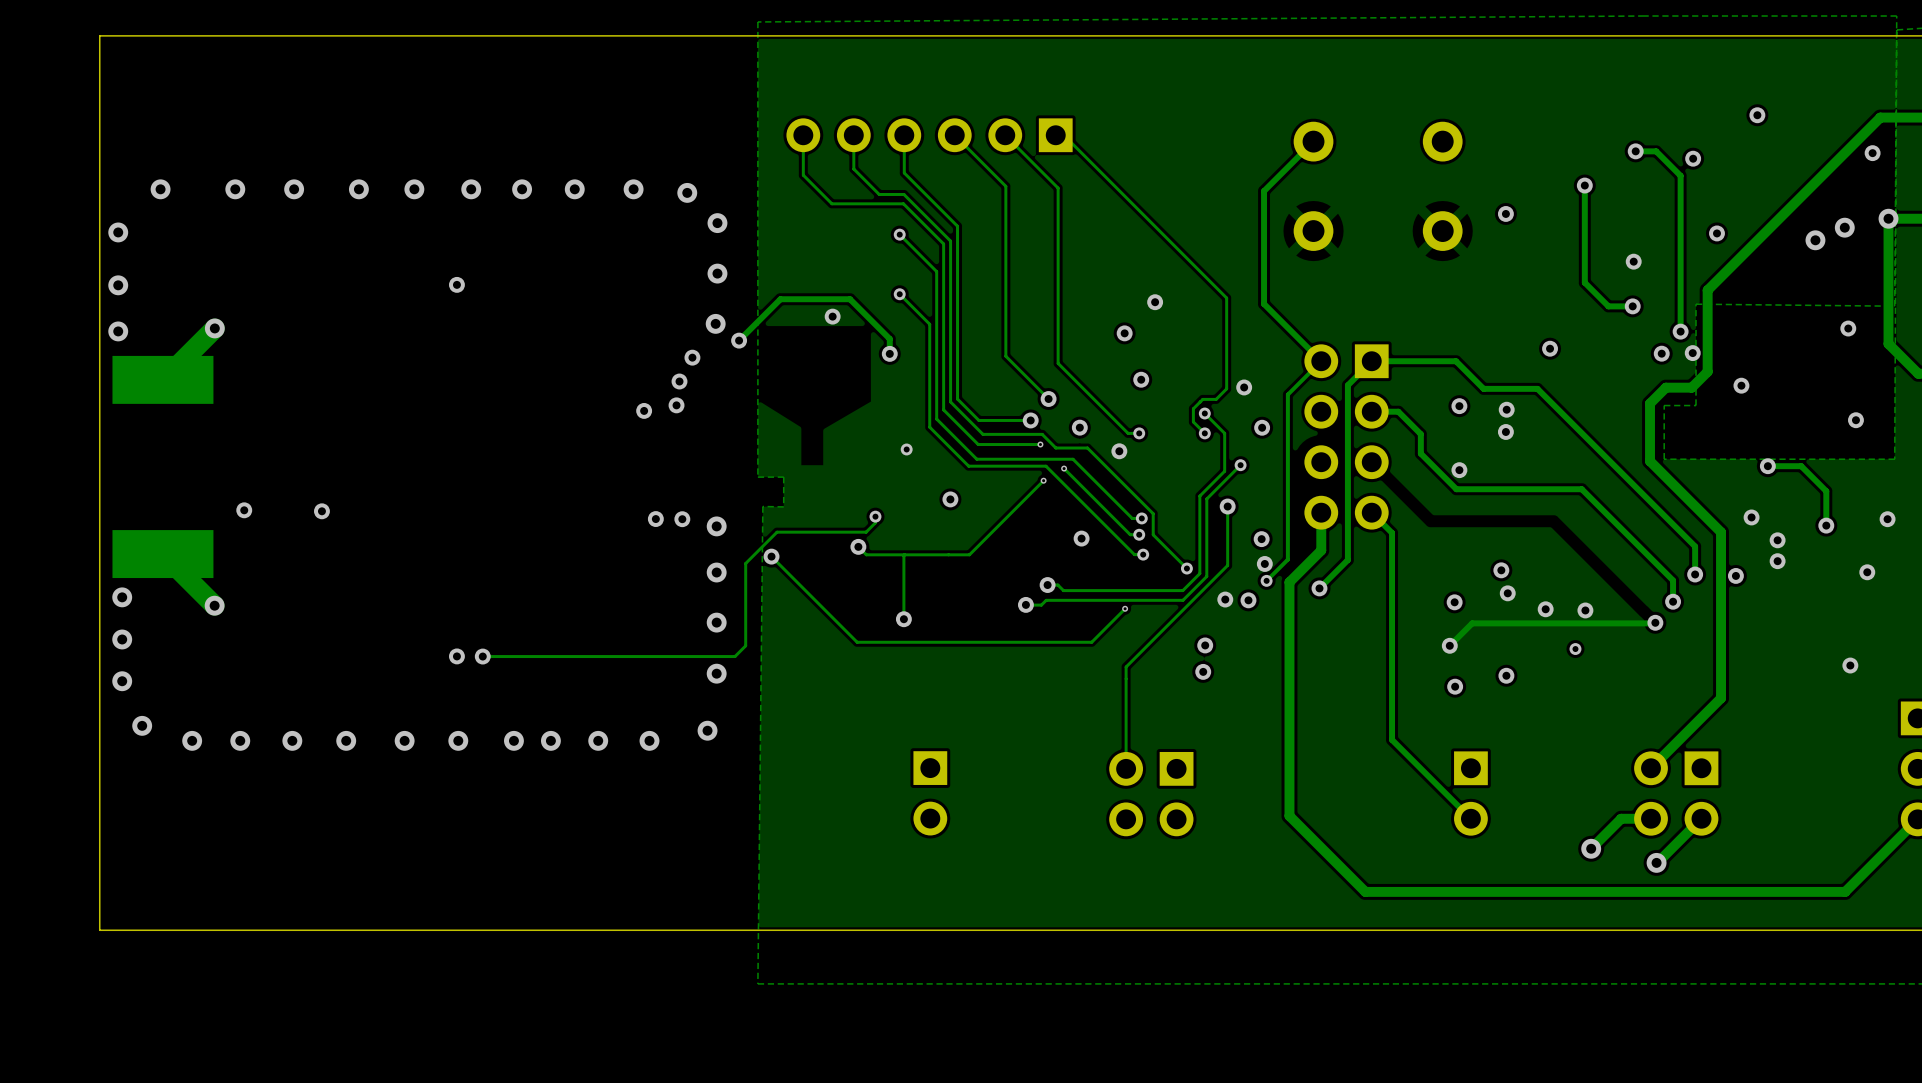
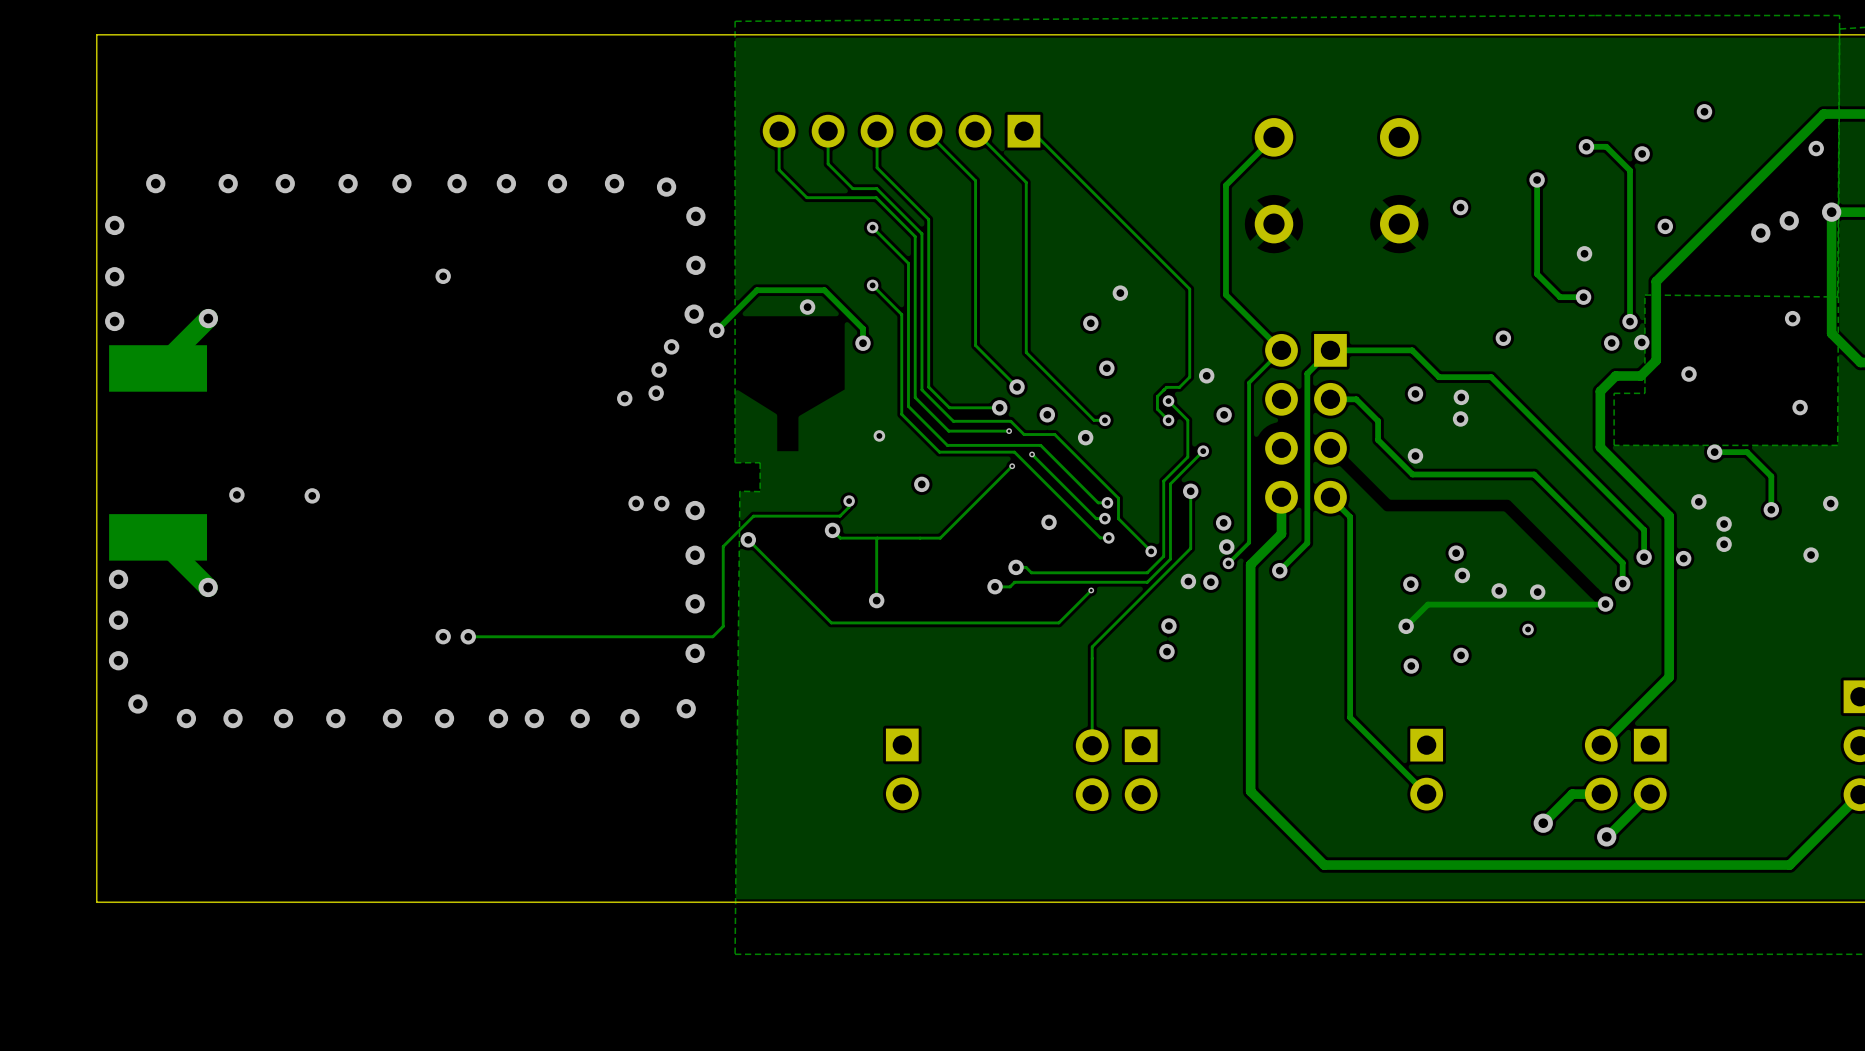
via: (1850, 665) -> none

